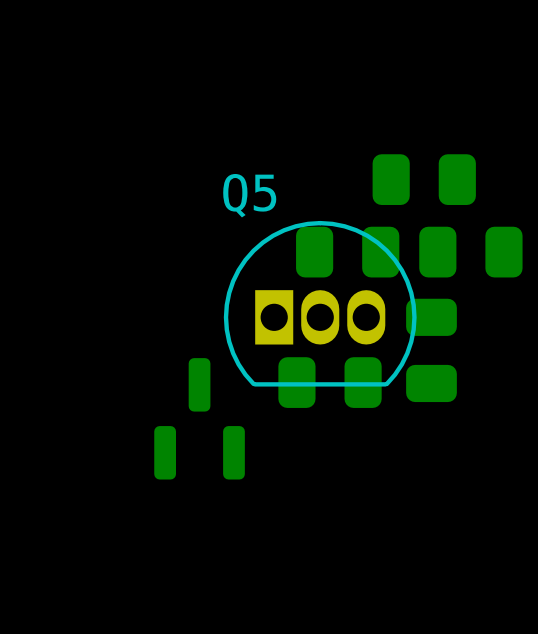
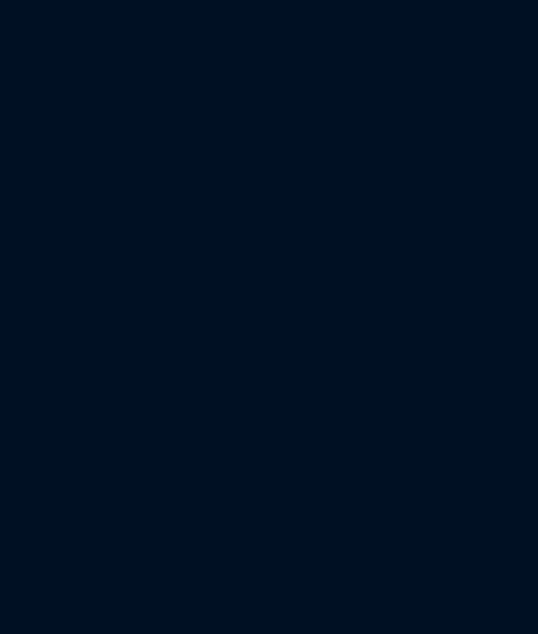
part: (424, 179) -> none
part: (347, 252) -> none
part: (470, 252) -> none
Q5: (320, 303) -> none
part: (431, 350) -> none
part: (330, 382) -> none
part: (199, 418) -> none

